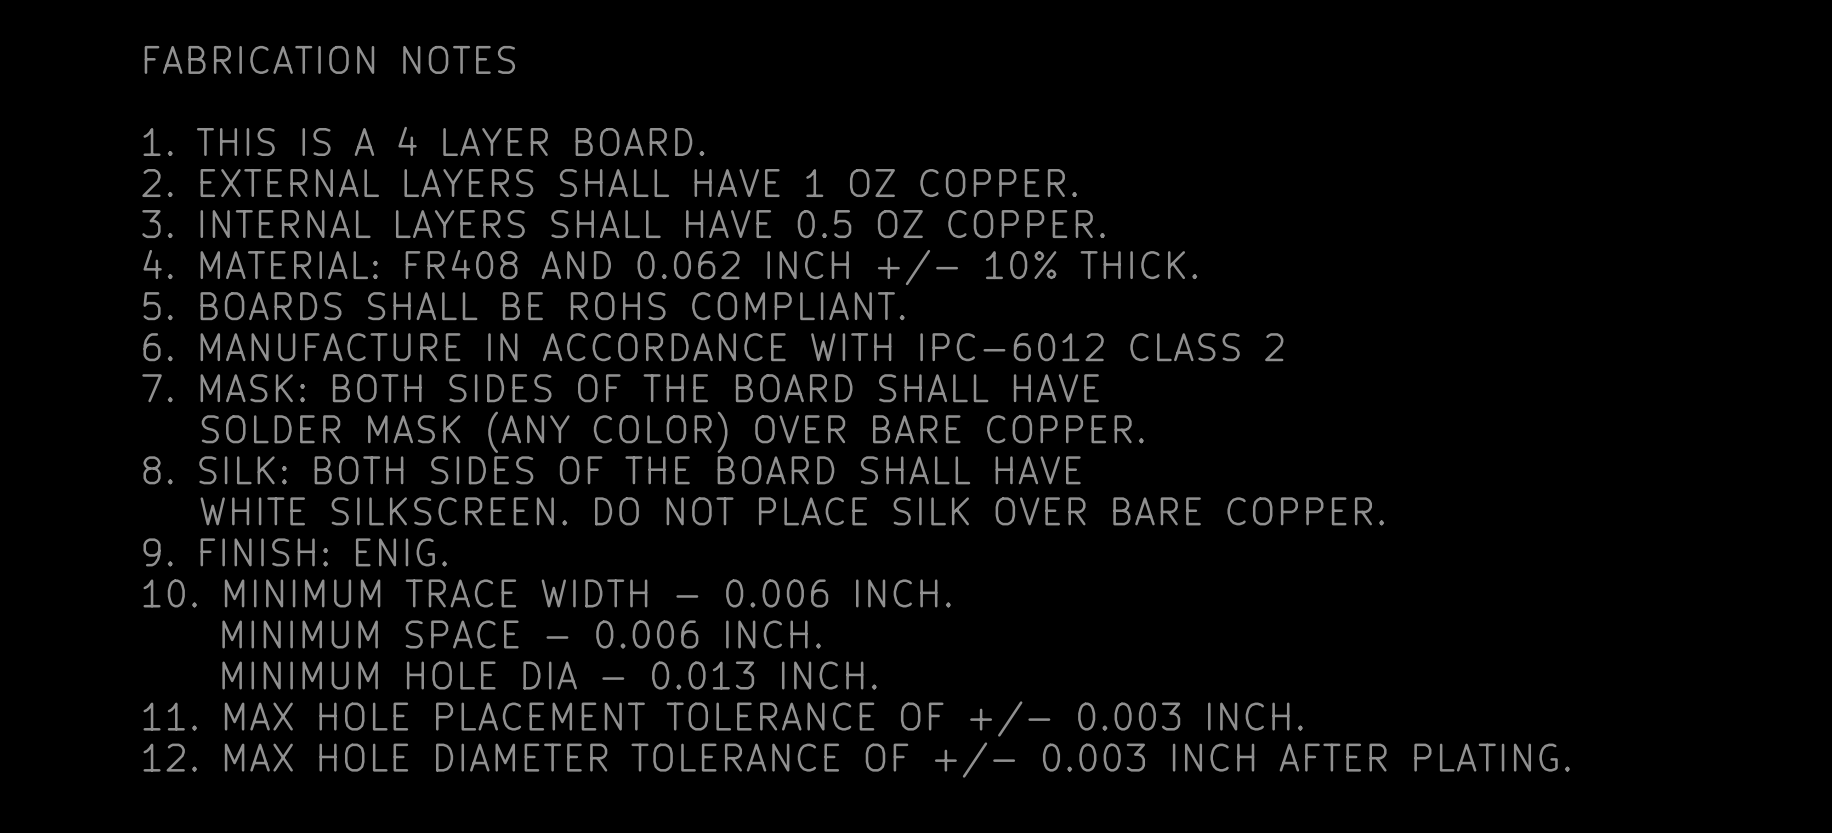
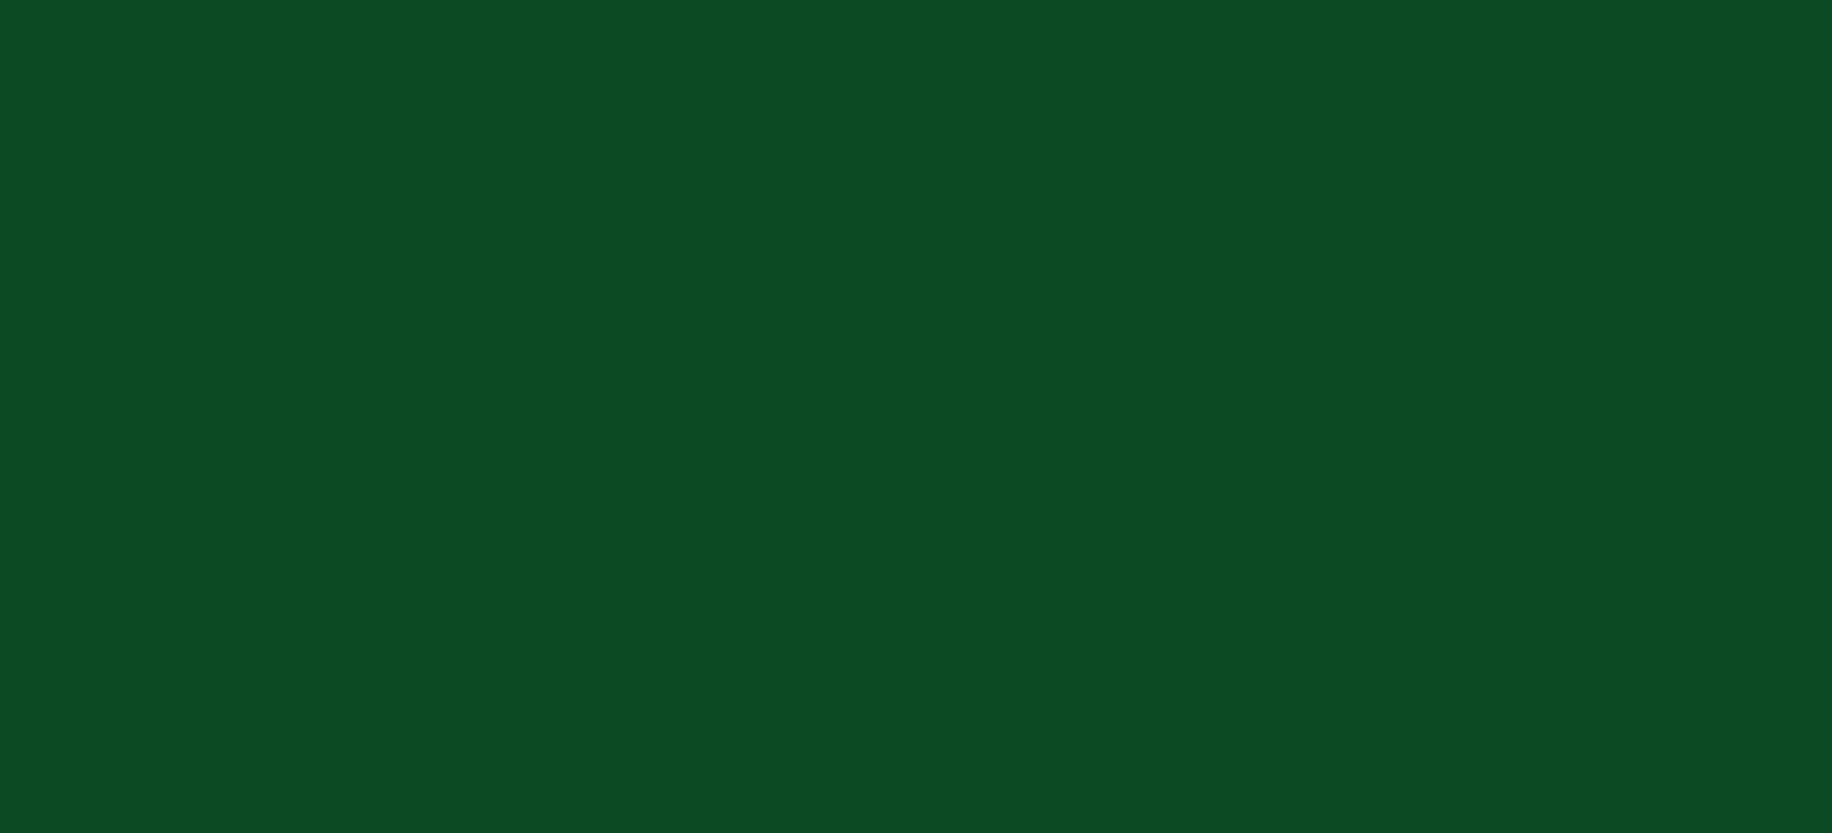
text: FABRICATION NOTES (329, 59) -> none
text: 1. THIS IS A 4 LAYER BOARD. (423, 141) -> none
text: 2. EXTERNAL LAYERS SHALL HAVE 1 OZ COPPER. (609, 183) -> none
text: 3. INTERNAL LAYERS SHALL HAVE 0.5 OZ COPPER. (623, 224) -> none
text: 4. MATERIAL: FR408 AND 0.062 INCH +/- 10% THICK. (670, 267) -> none
text: 5. BOARDS SHALL BE ROHS COMPLIANT. (524, 306) -> none
text: 6. MANUFACTURE IN ACCORDANCE WITH IPC-6012 CLASS 2 (713, 347) -> none
text: 7. MASK: BOTH SIDES OF THE BOARD SHALL HAVE (620, 388) -> none
text: SOLDER MASK (ANY COLOR) OVER BARE COPPER. (672, 432) -> none
text: 8. SILK: BOTH SIDES OF THE BOARD SHALL HAVE (612, 470) -> none
text: WHITE SILKSCREEN. DO NOT PLACE SILK OVER BARE COPPER. (792, 511) -> none
text: 9. FINISH: ENIG. (295, 552) -> none
text: 10. MINIMUM TRACE WIDTH - 0.006 INCH. (547, 593) -> none
text: MINIMUM SPACE - 0.006 INCH. (521, 634) -> none
text: MINIMUM HOLE DIA - 0.013 INCH. (549, 675) -> none
text: 11. MAX HOLE PLACEMENT TOLERANCE OF +/- 0.003 INCH. (723, 718) -> none
text: 12. MAX HOLE DIAMETER TOLERANCE OF +/- 0.003 INCH AFTER PLATING. (856, 760) -> none

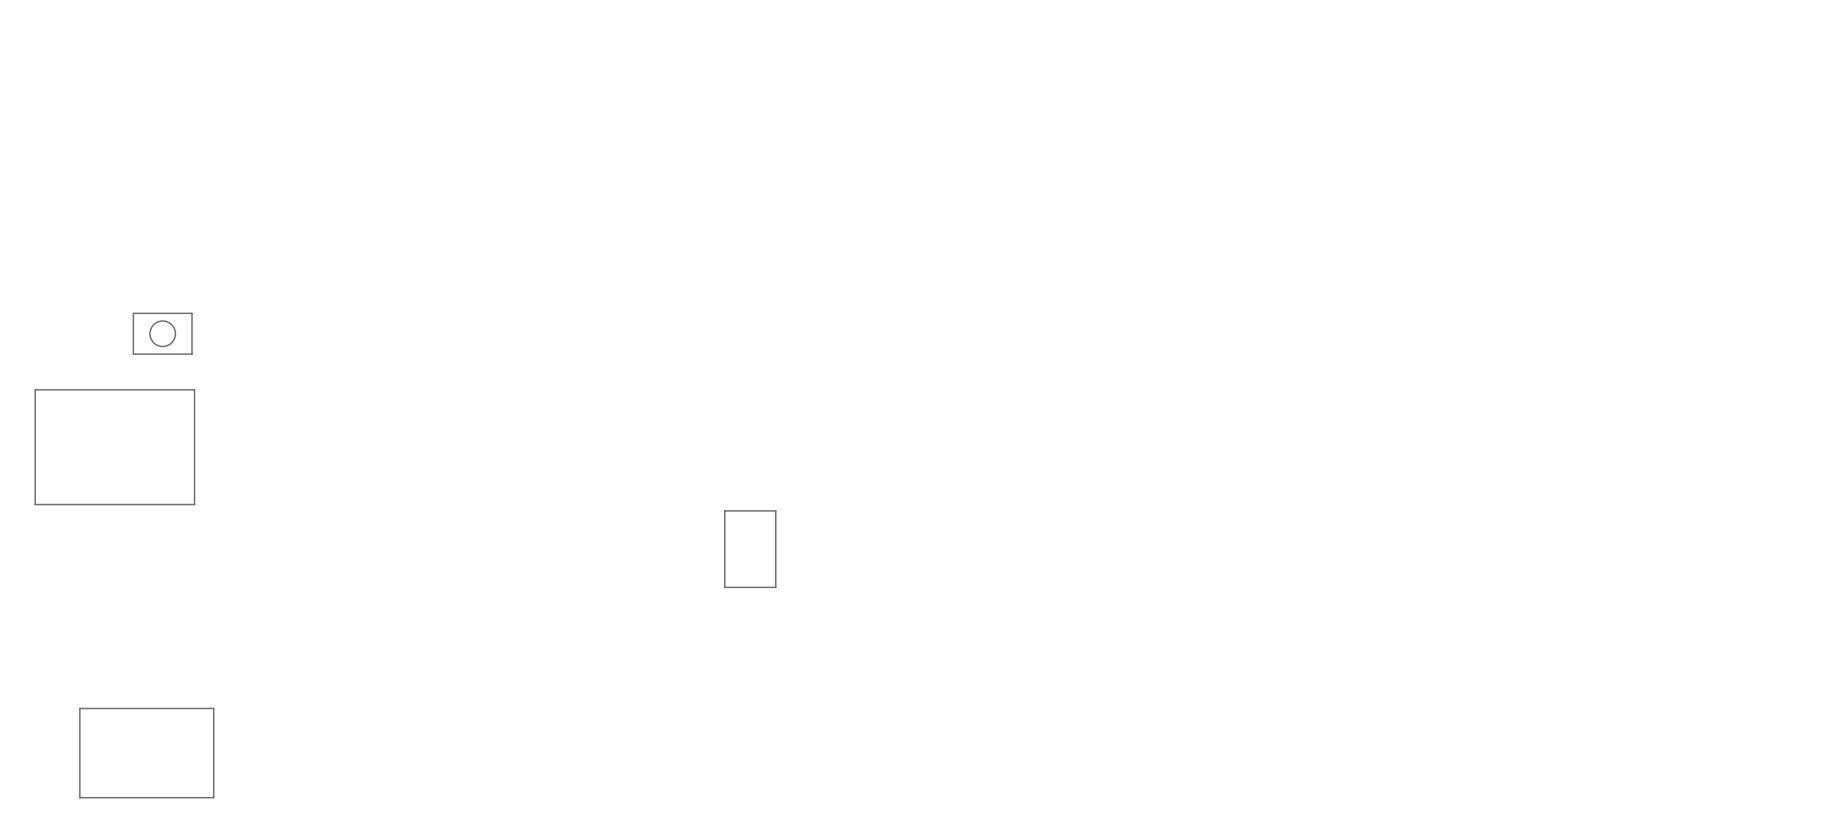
line: none -> (133, 313) (133, 354) (192, 354) (192, 313) (133, 313)
drawing: none -> [149, 320, 177, 348]
line: none -> (35, 389) (35, 504) (194, 504) (194, 389) (35, 389)
line: none -> (724, 510) (724, 587) (775, 587) (775, 510) (724, 510)
line: none -> (79, 708) (79, 797) (213, 797) (213, 708) (79, 708)

